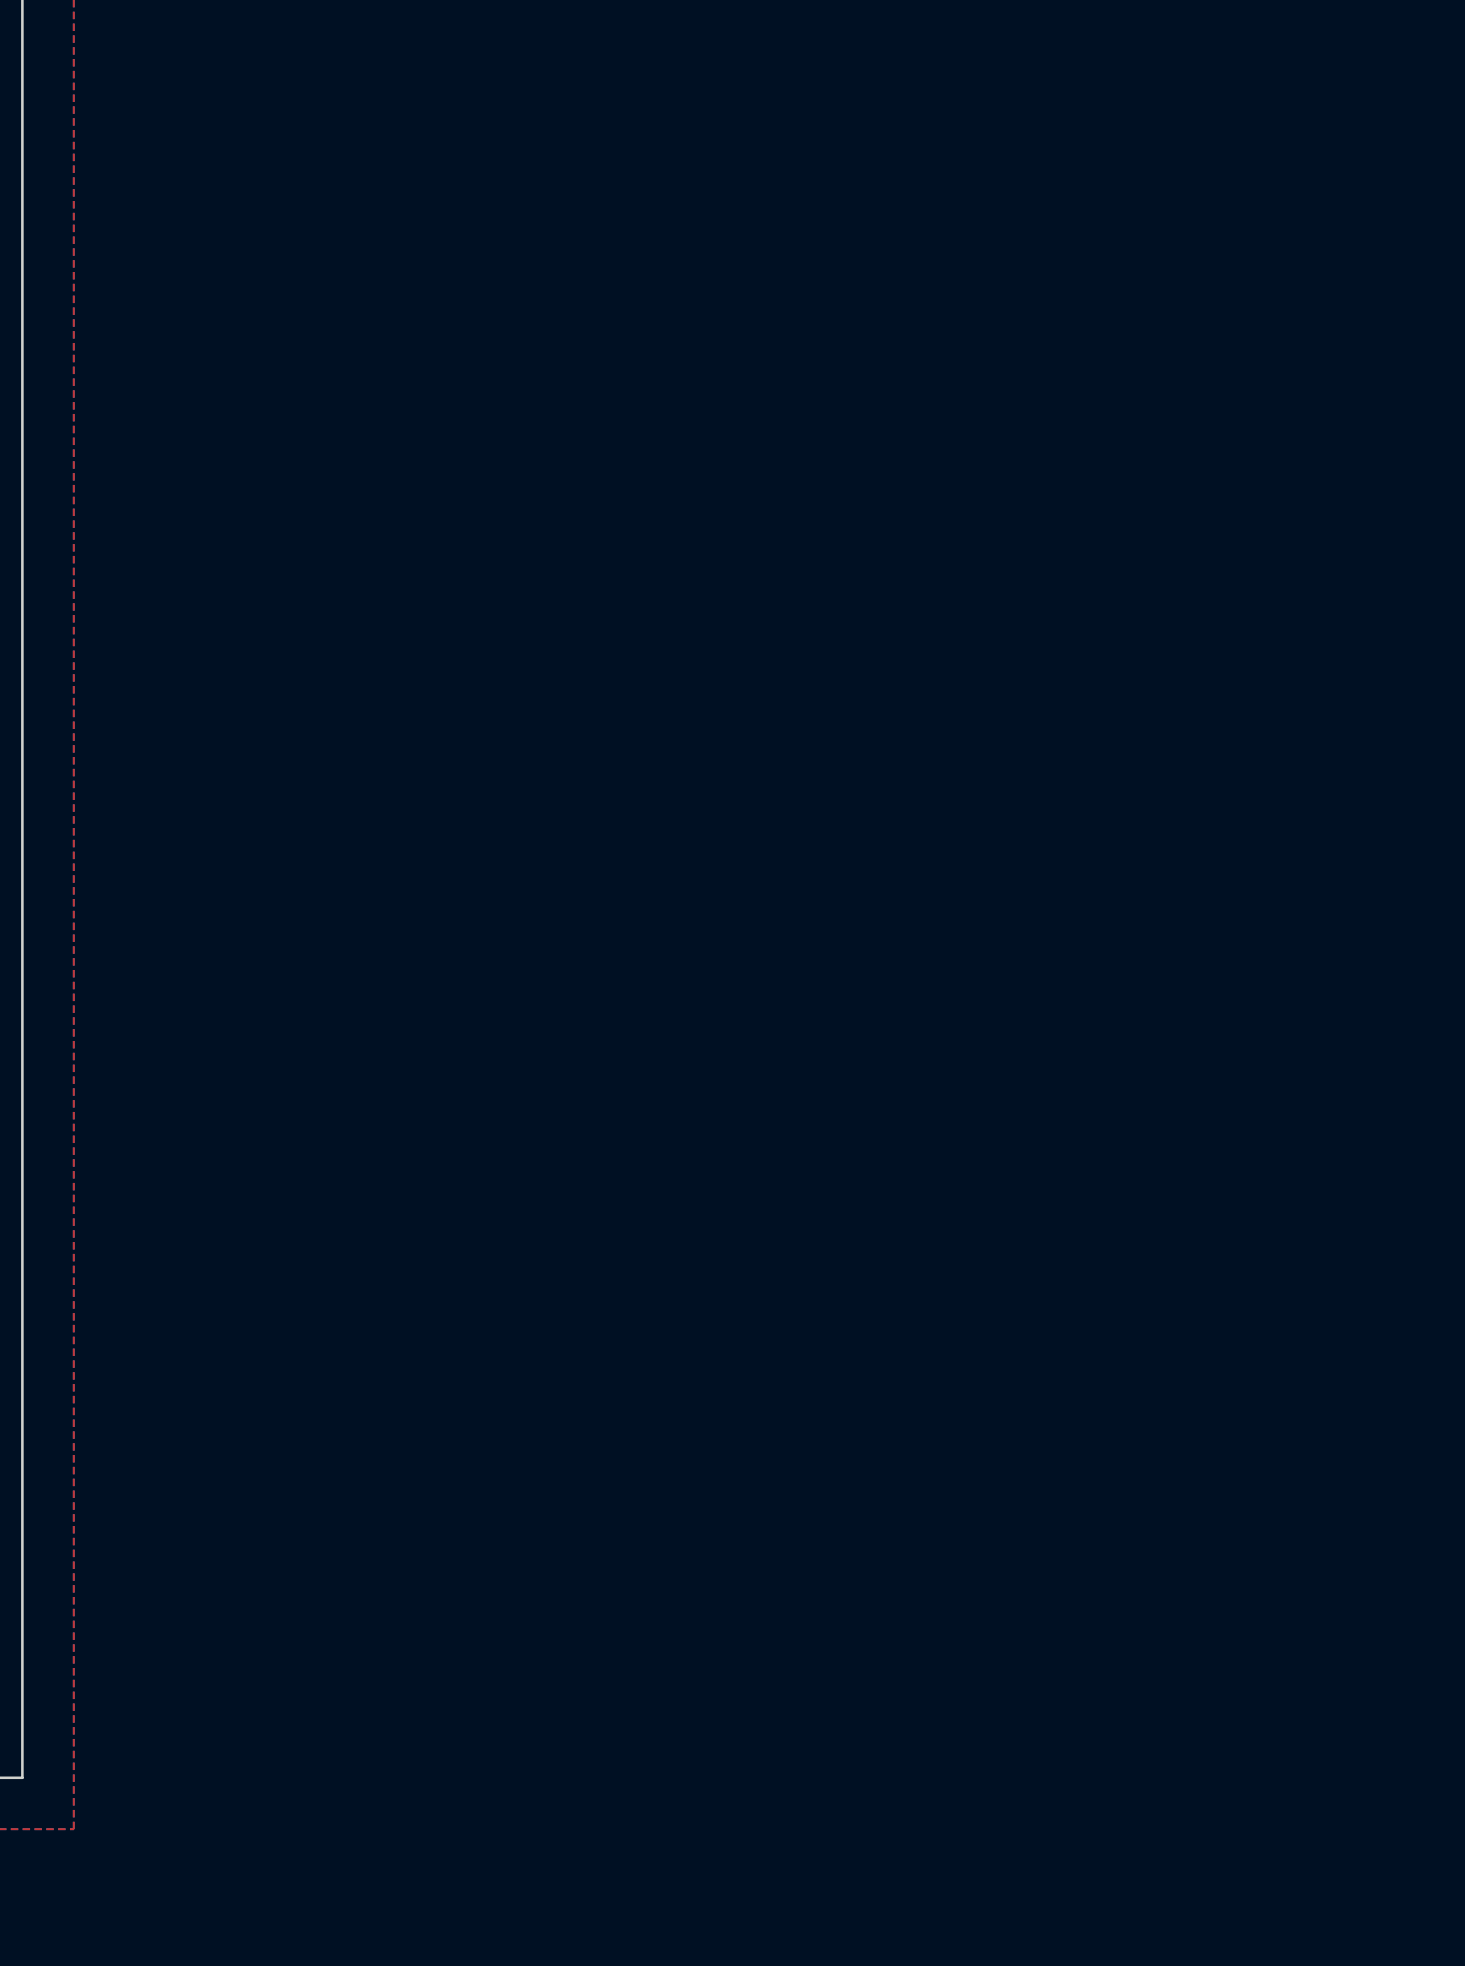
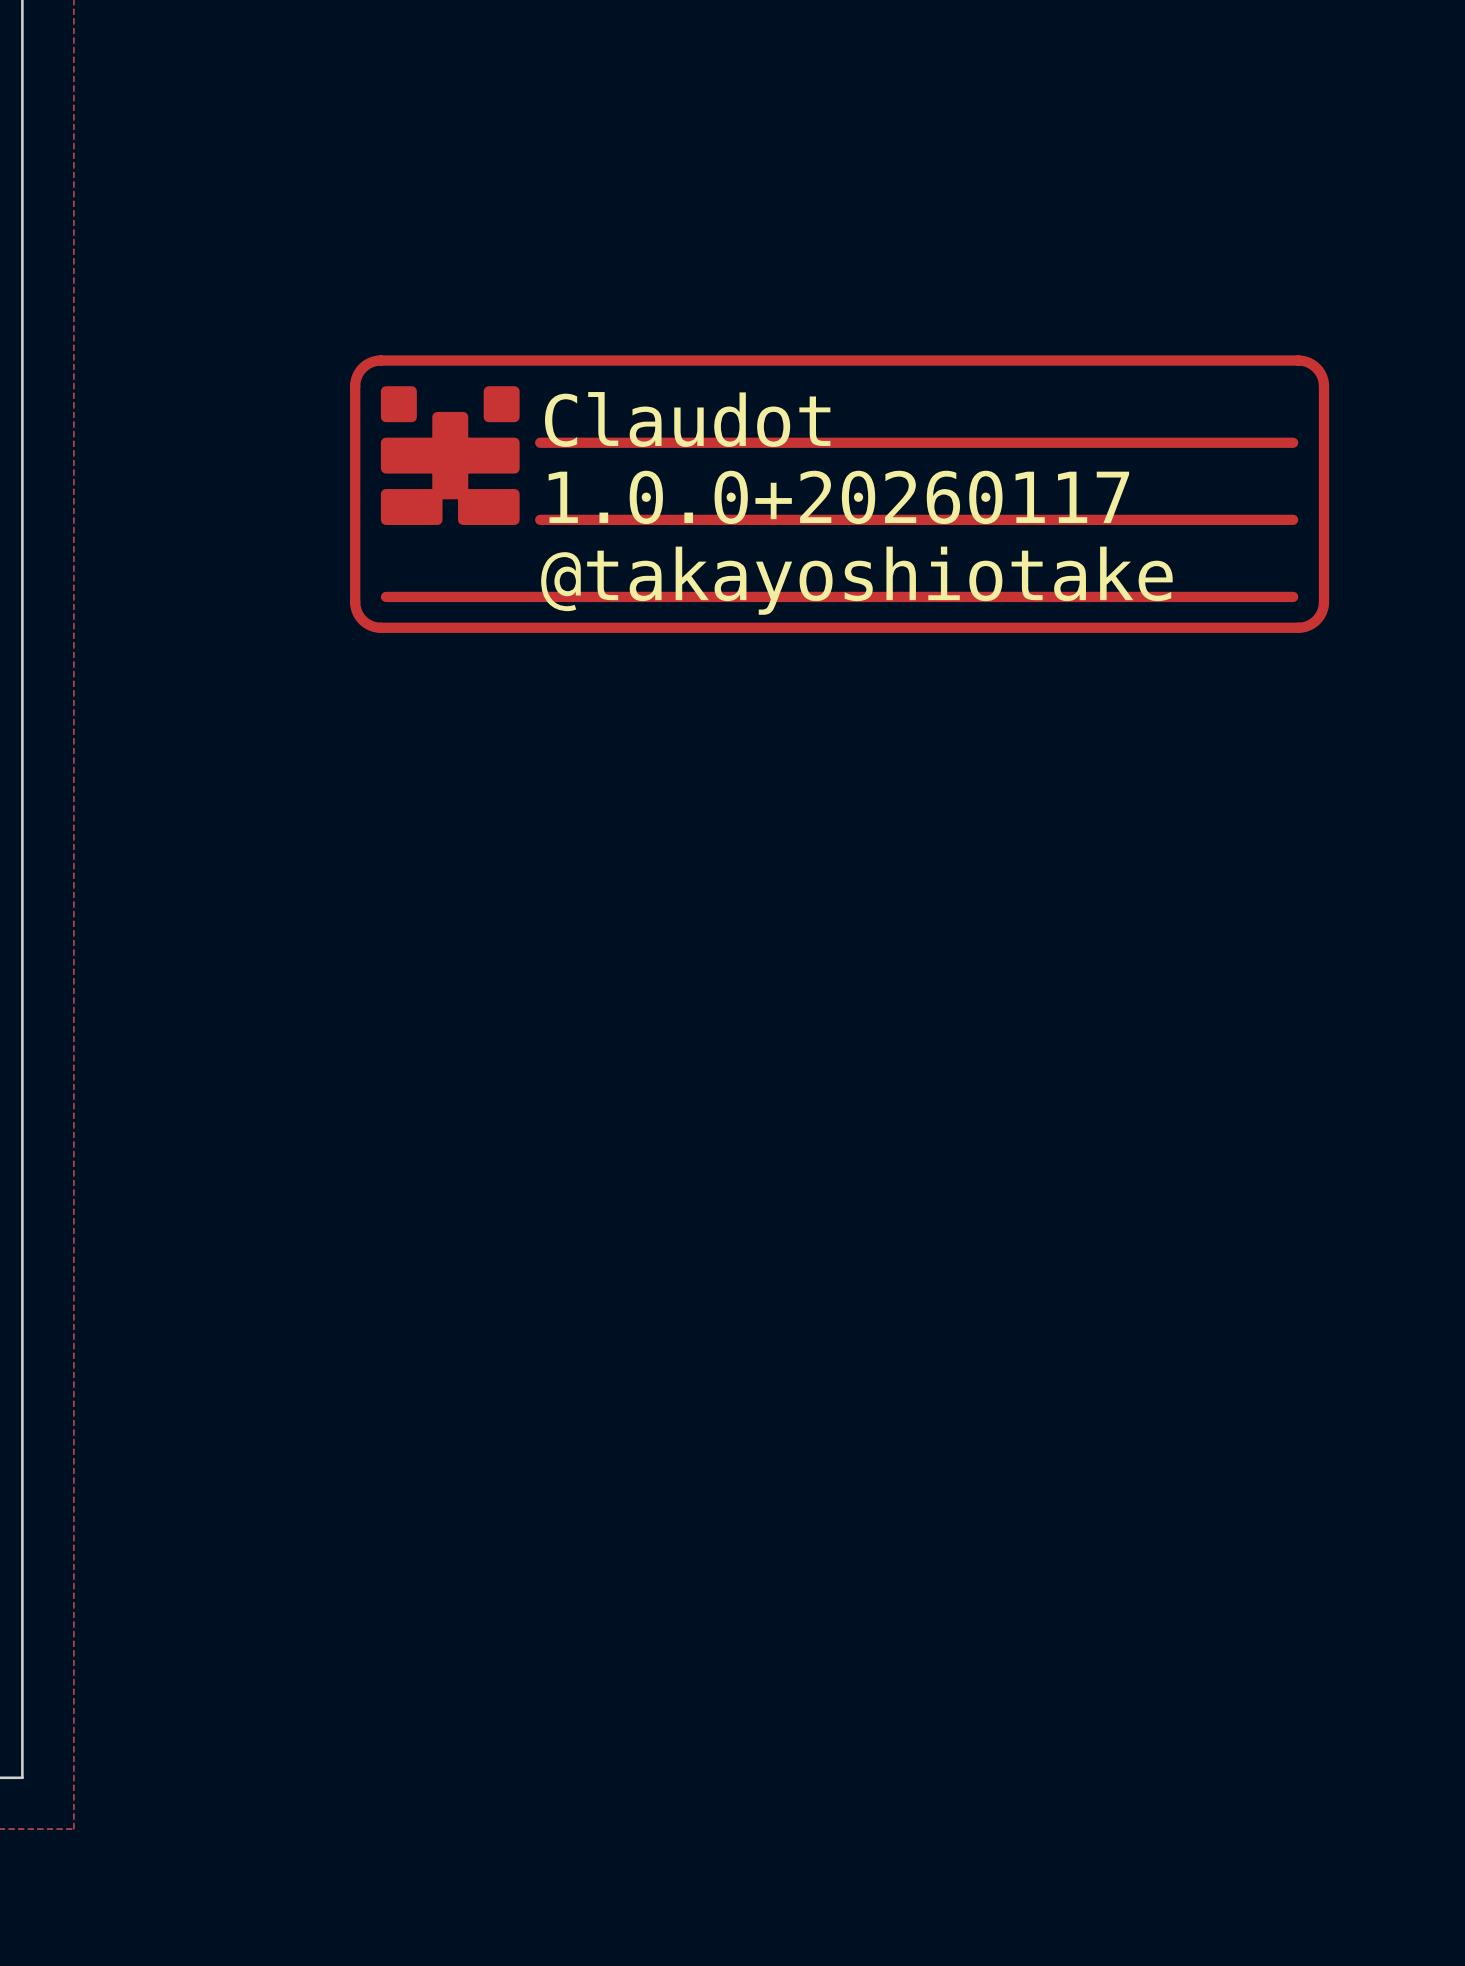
top track: none -> (380, 360) (1304, 361) (1318, 370) (1323, 382) (1323, 608) (1313, 622) (1298, 627) (374, 626) (362, 620) (355, 605) (355, 386) (357, 376) (362, 368) (371, 362) (380, 360)
drawing: none -> [380, 386, 520, 525]
text: none -> Claudot (687, 419)
top track: none -> (540, 442) (1293, 442)
text: none -> 1.0.0+20260117 (838, 497)
top track: none -> (540, 519) (1293, 519)
text: none -> @takayoshiotake (856, 580)
top track: none -> (386, 596) (1293, 596)

